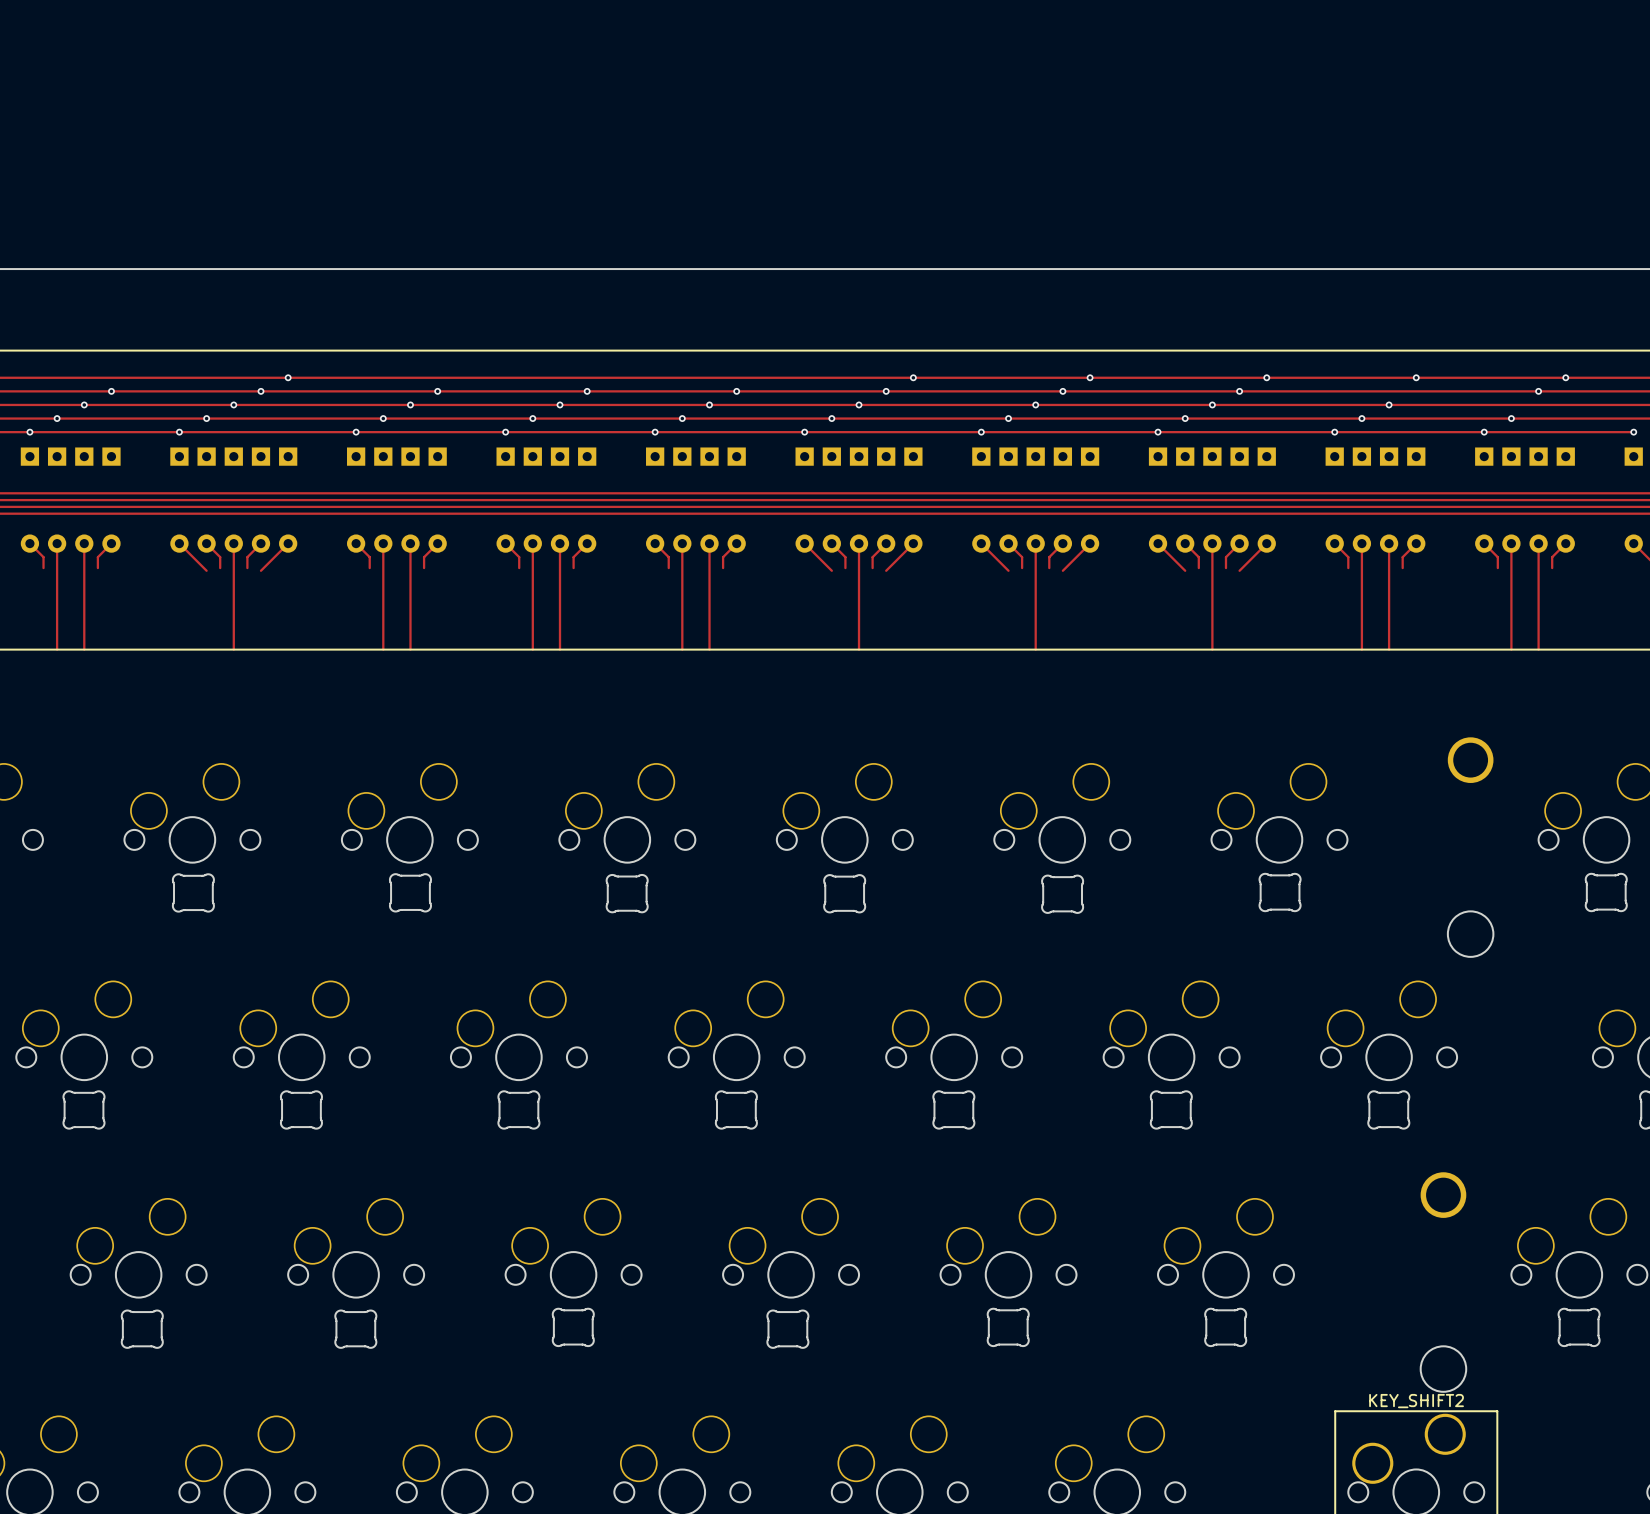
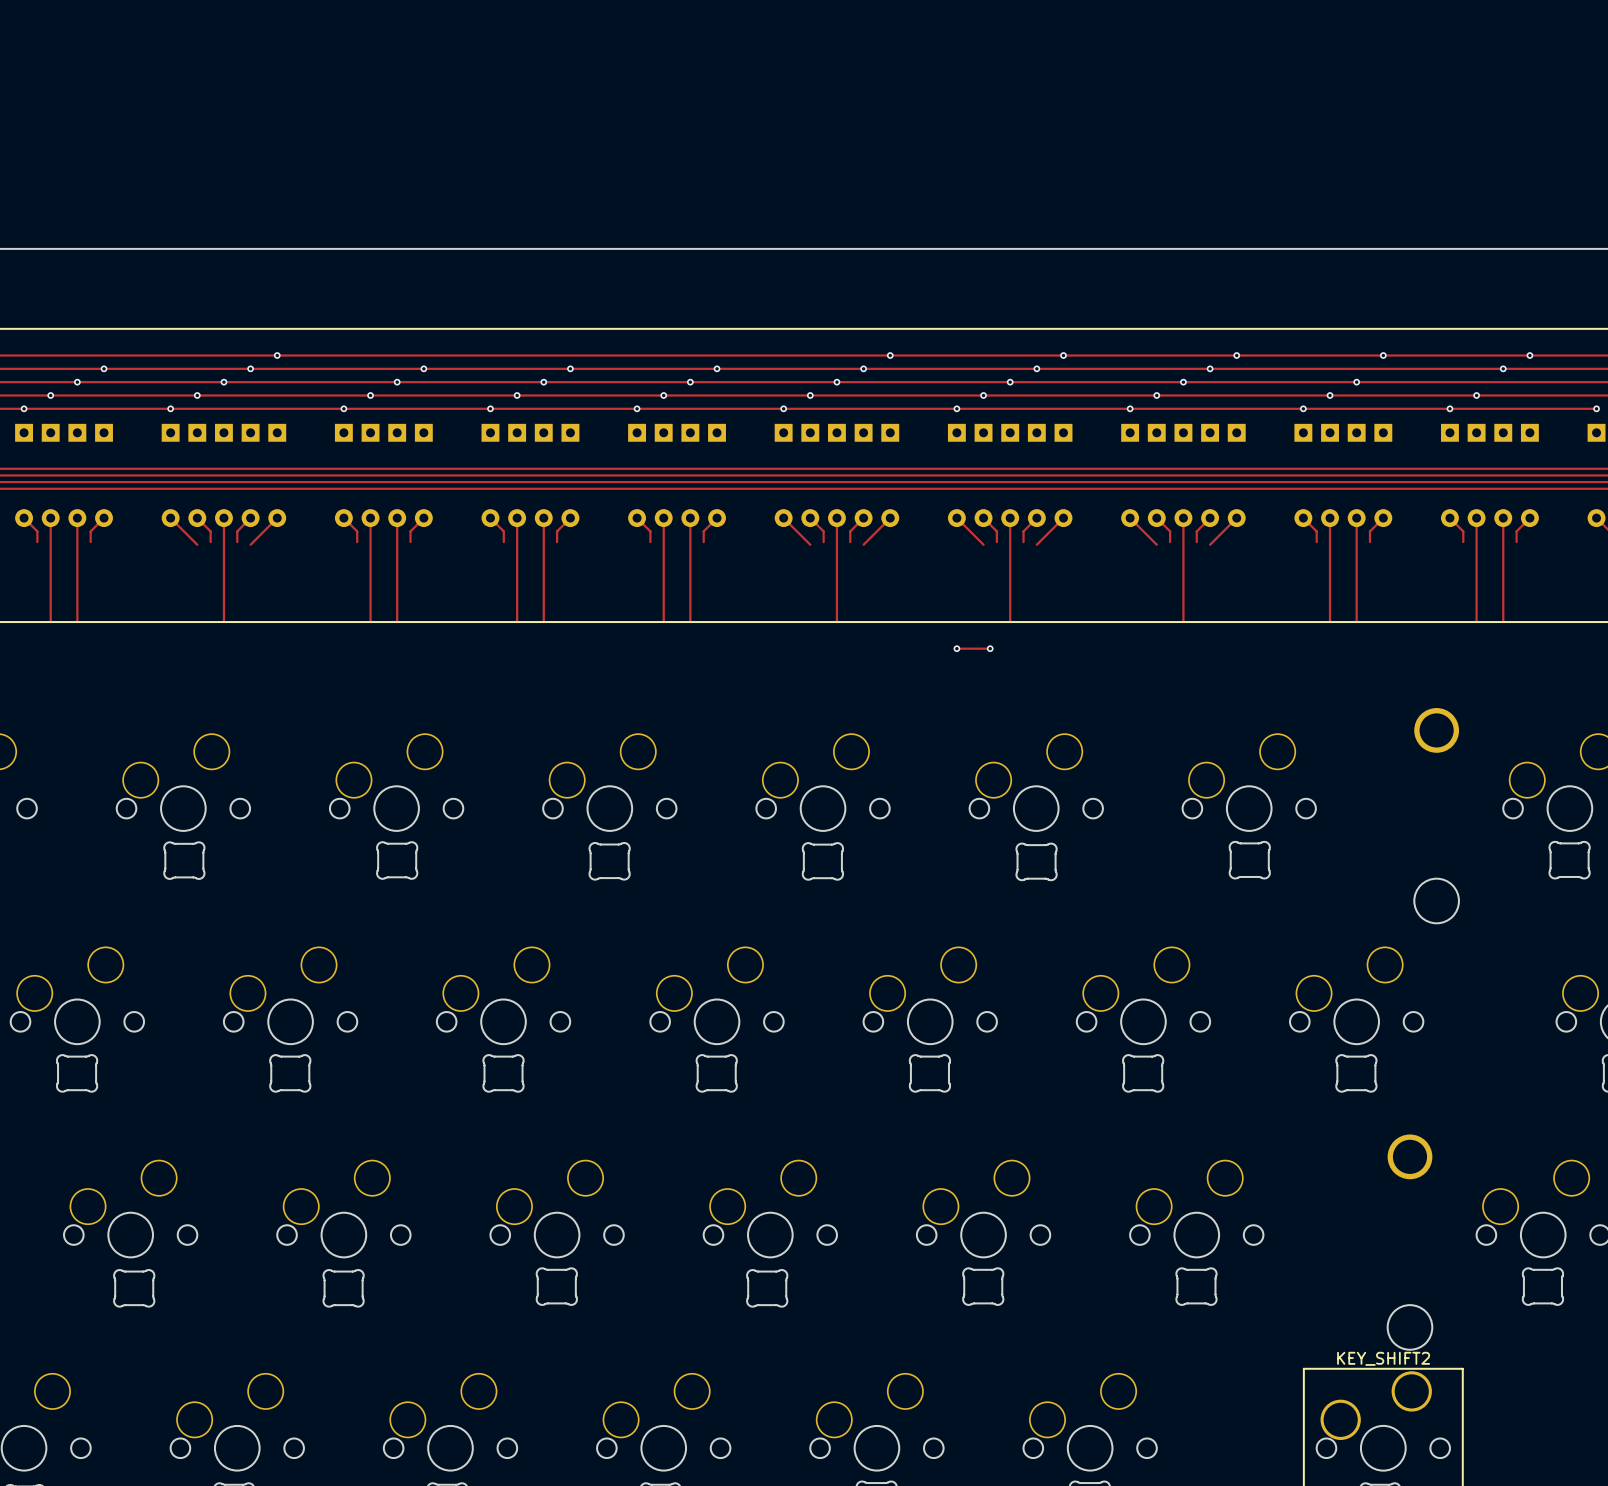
track: none -> (956, 648) (990, 648)
via: none -> (956, 648)
via: none -> (990, 648)

